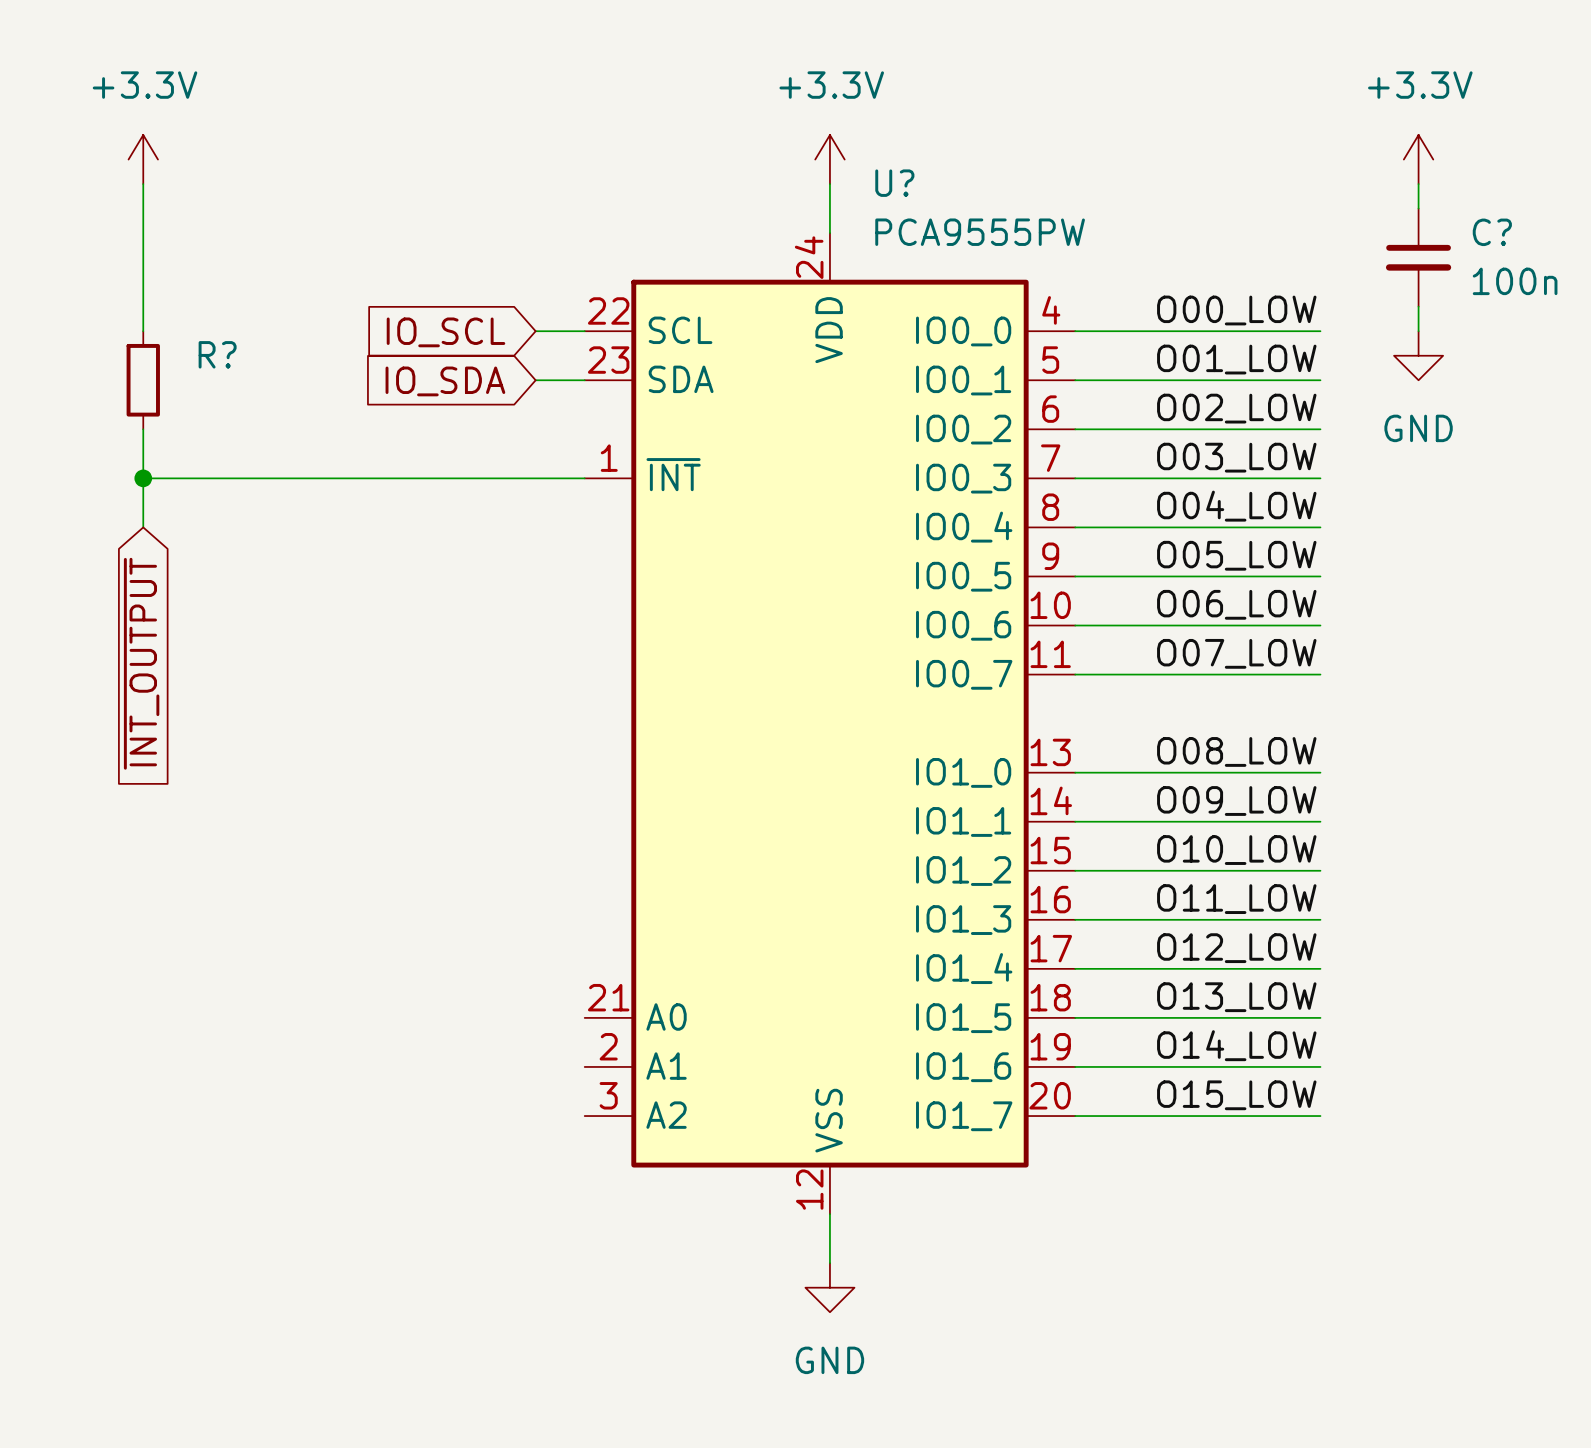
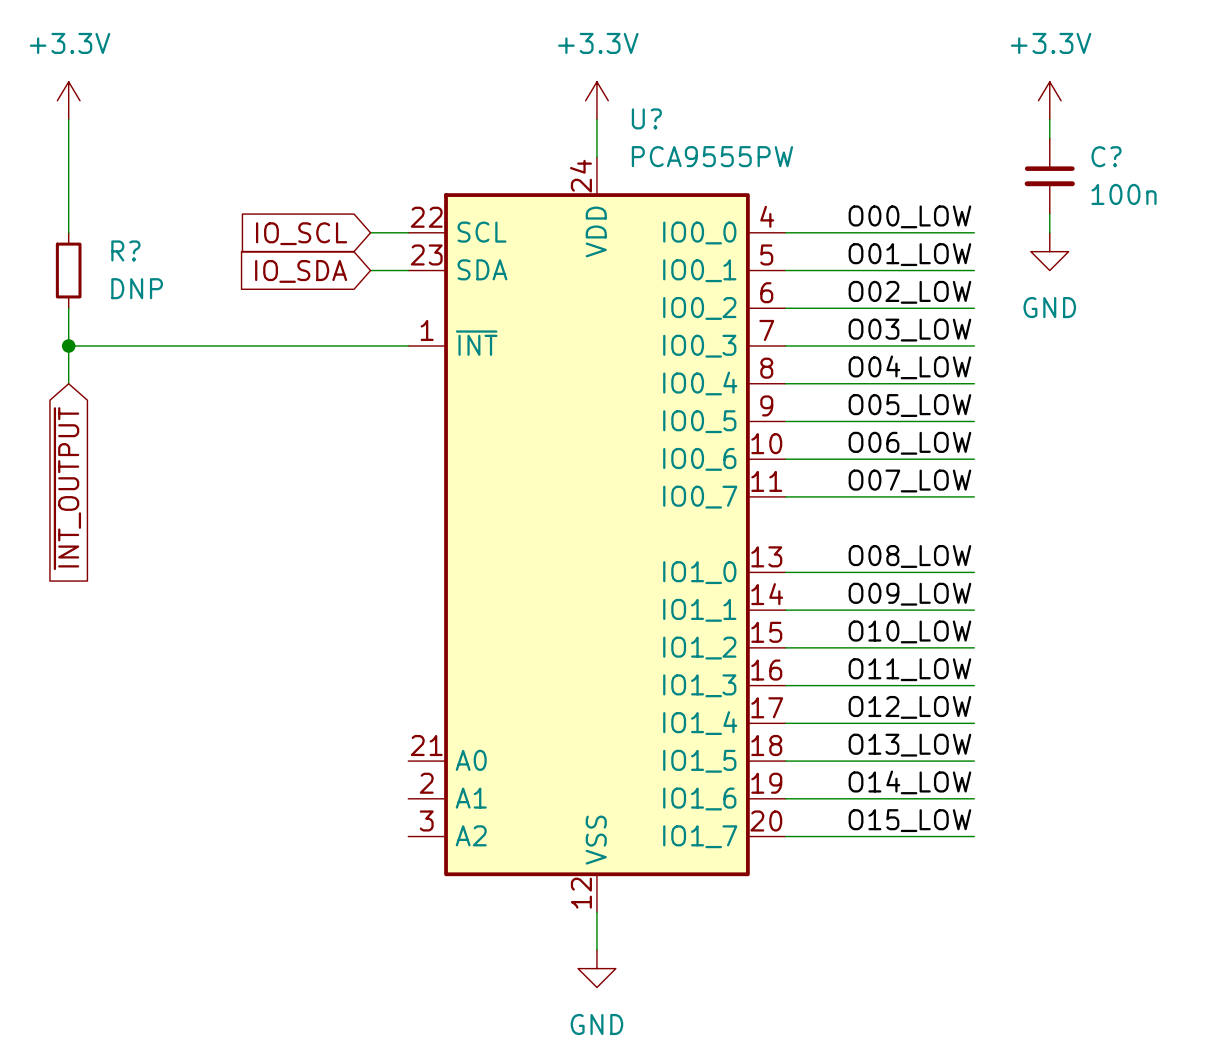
R? value: none -> DNP (137, 288)

